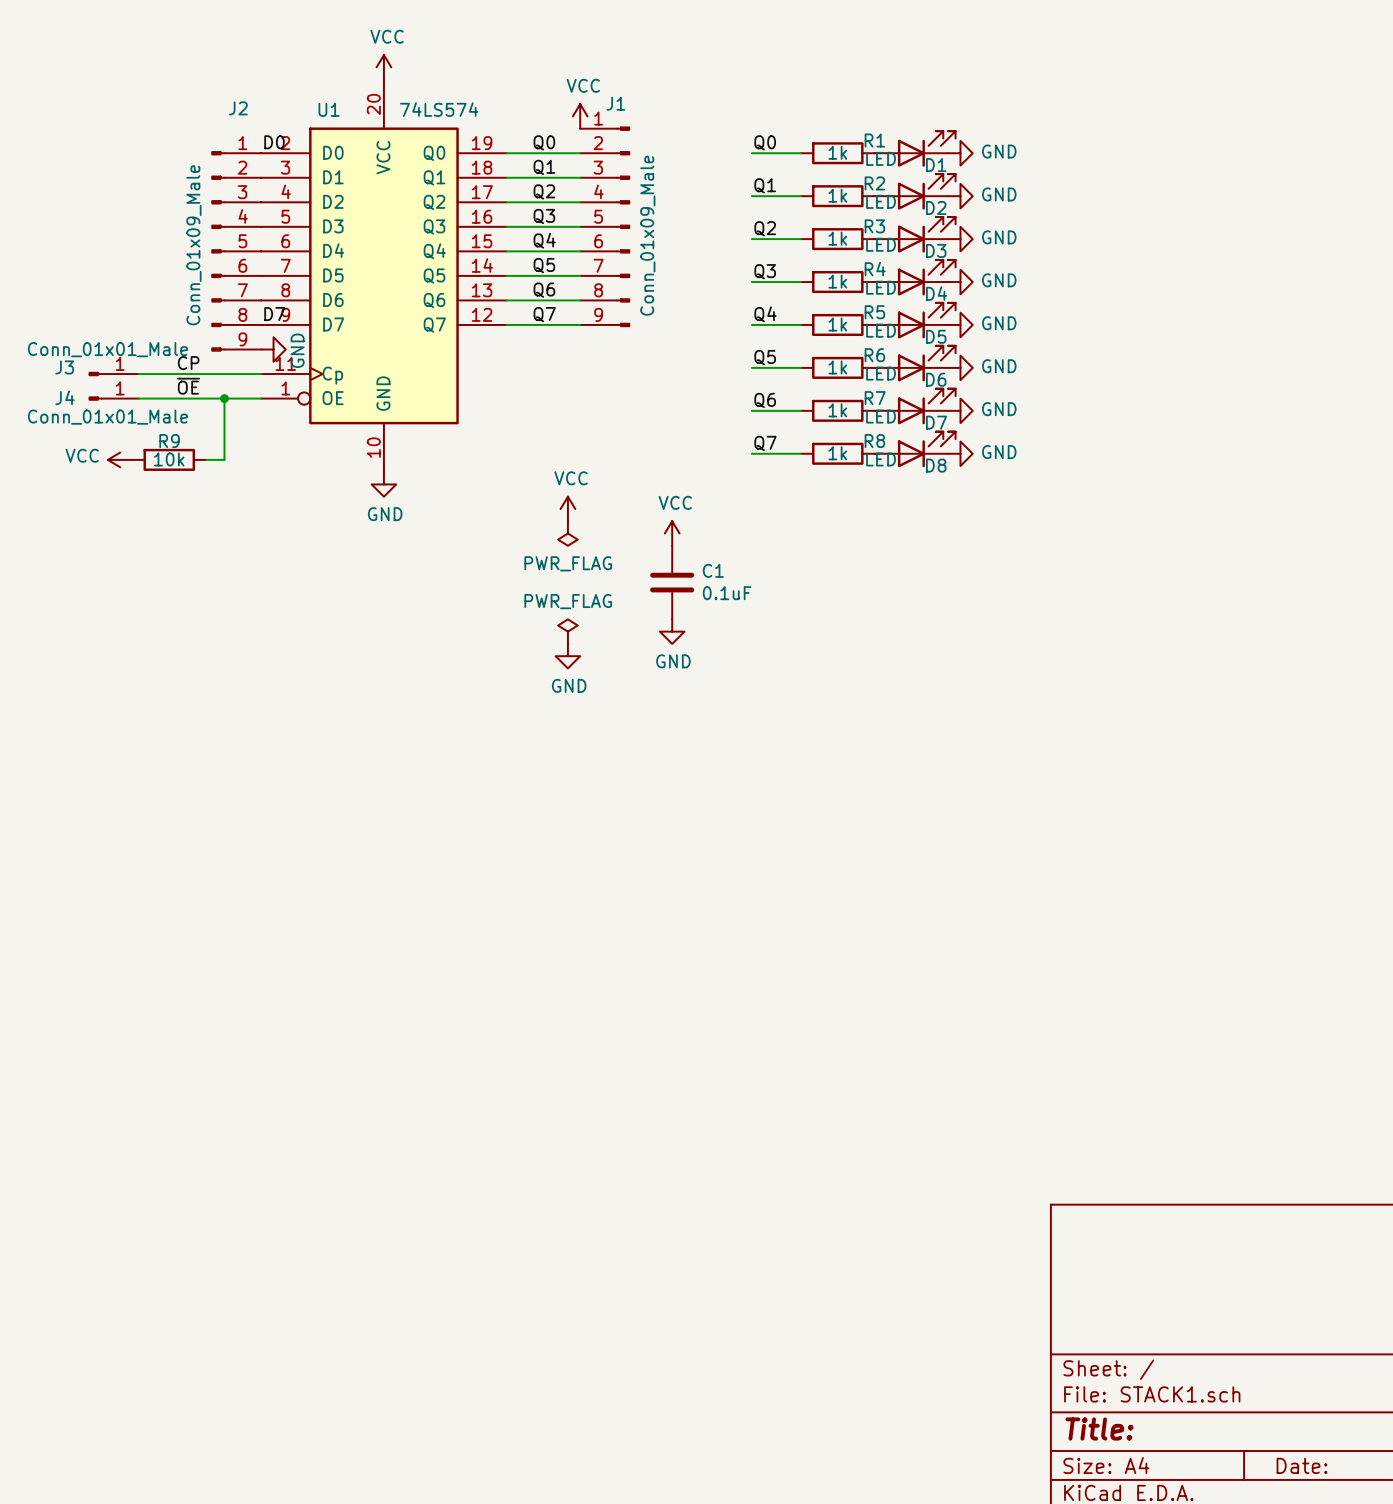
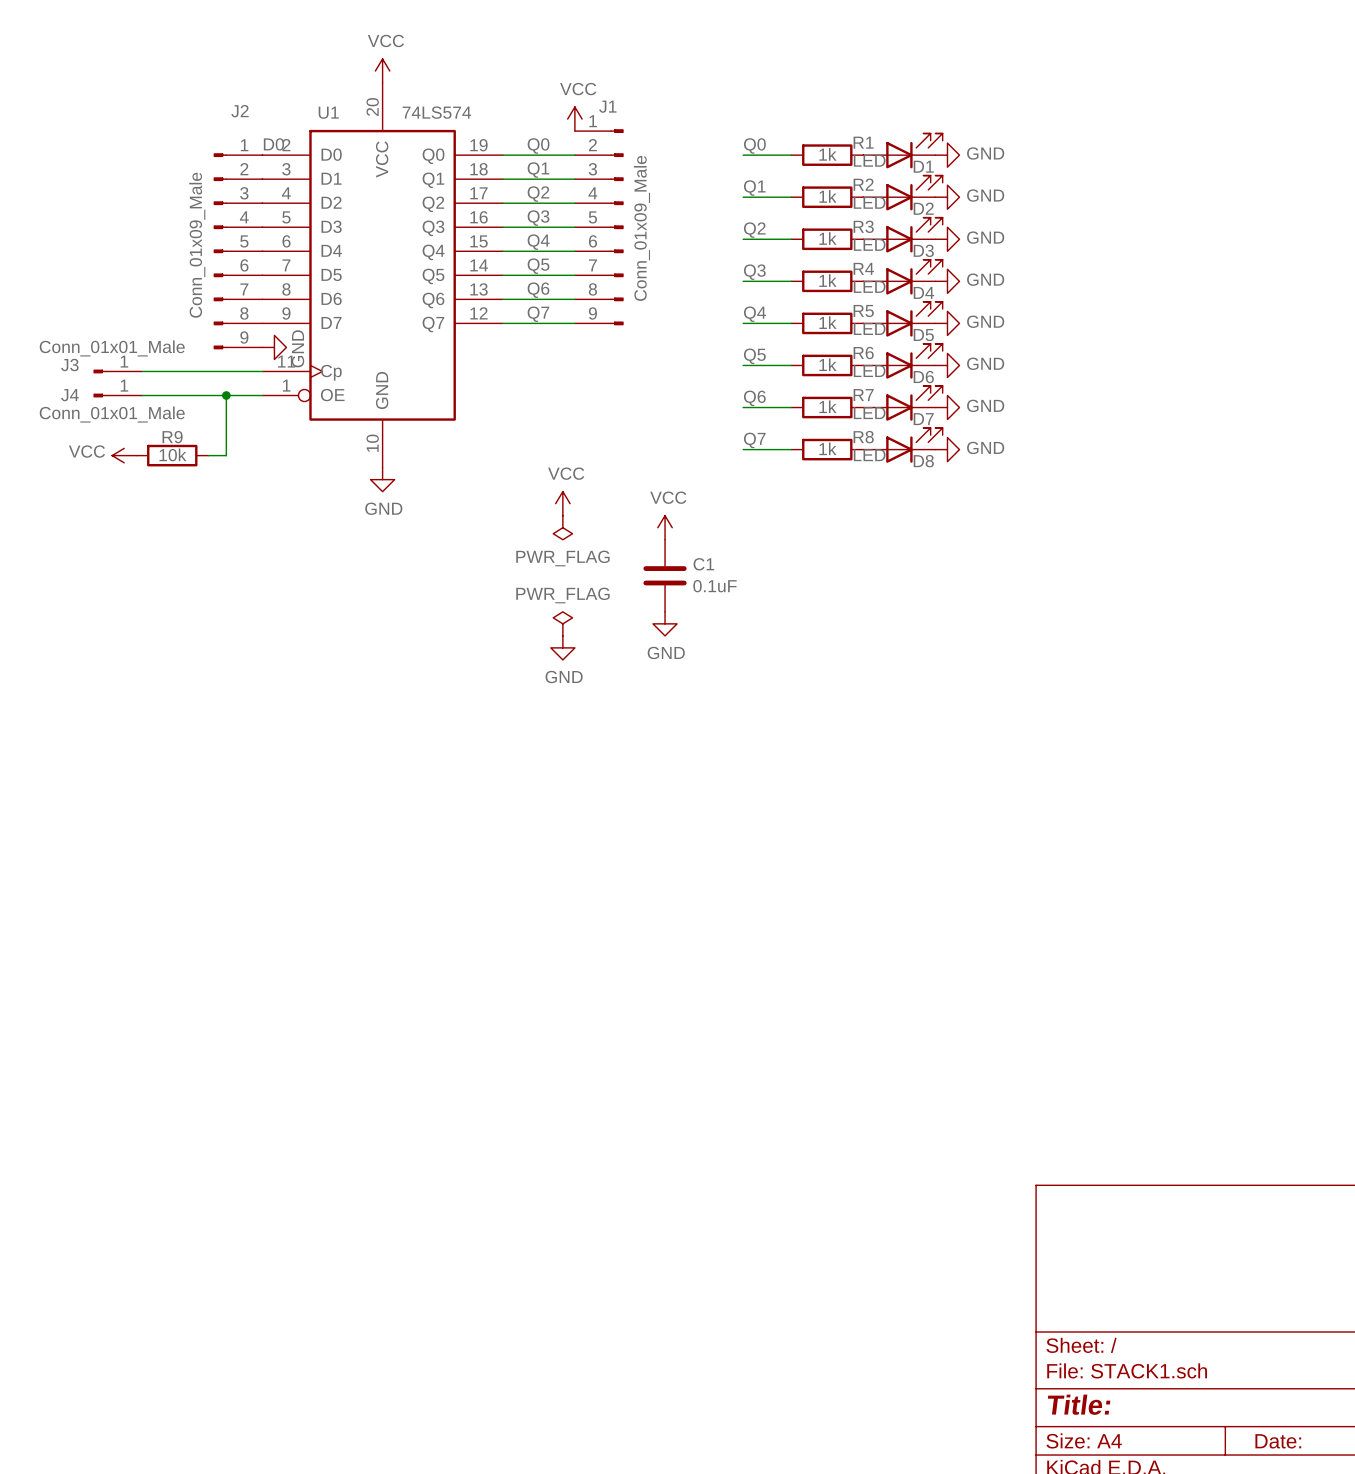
label: D7 (274, 314) -> none
label: CP (188, 363) -> none
label: ~{OE} (188, 386) -> none

